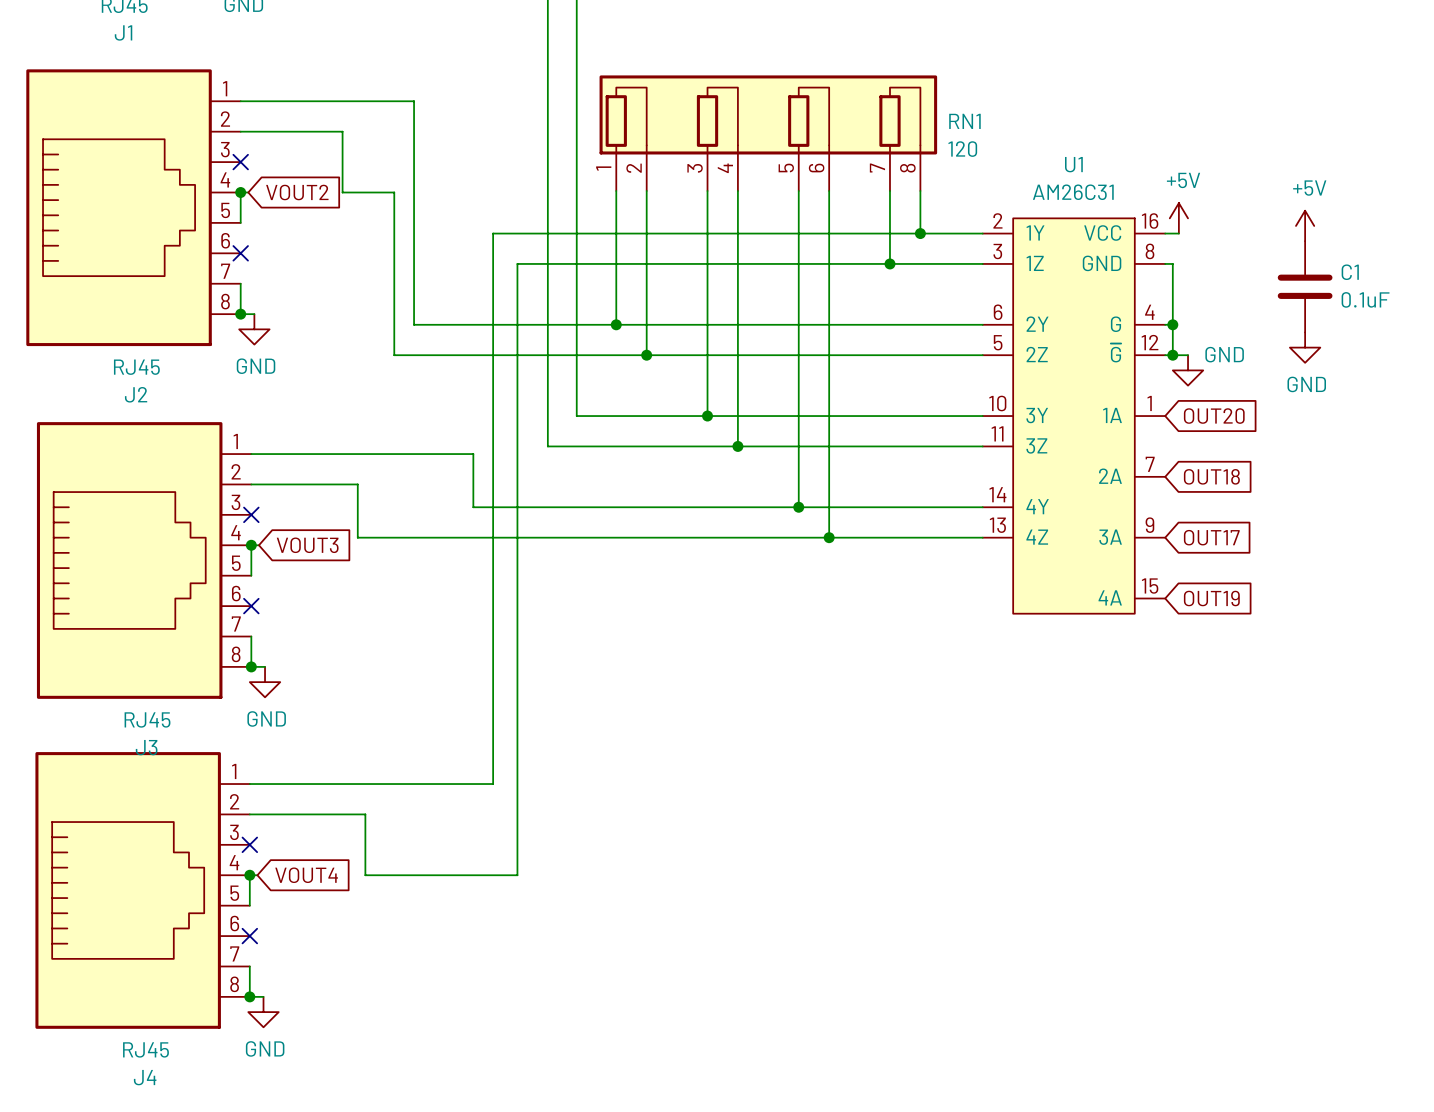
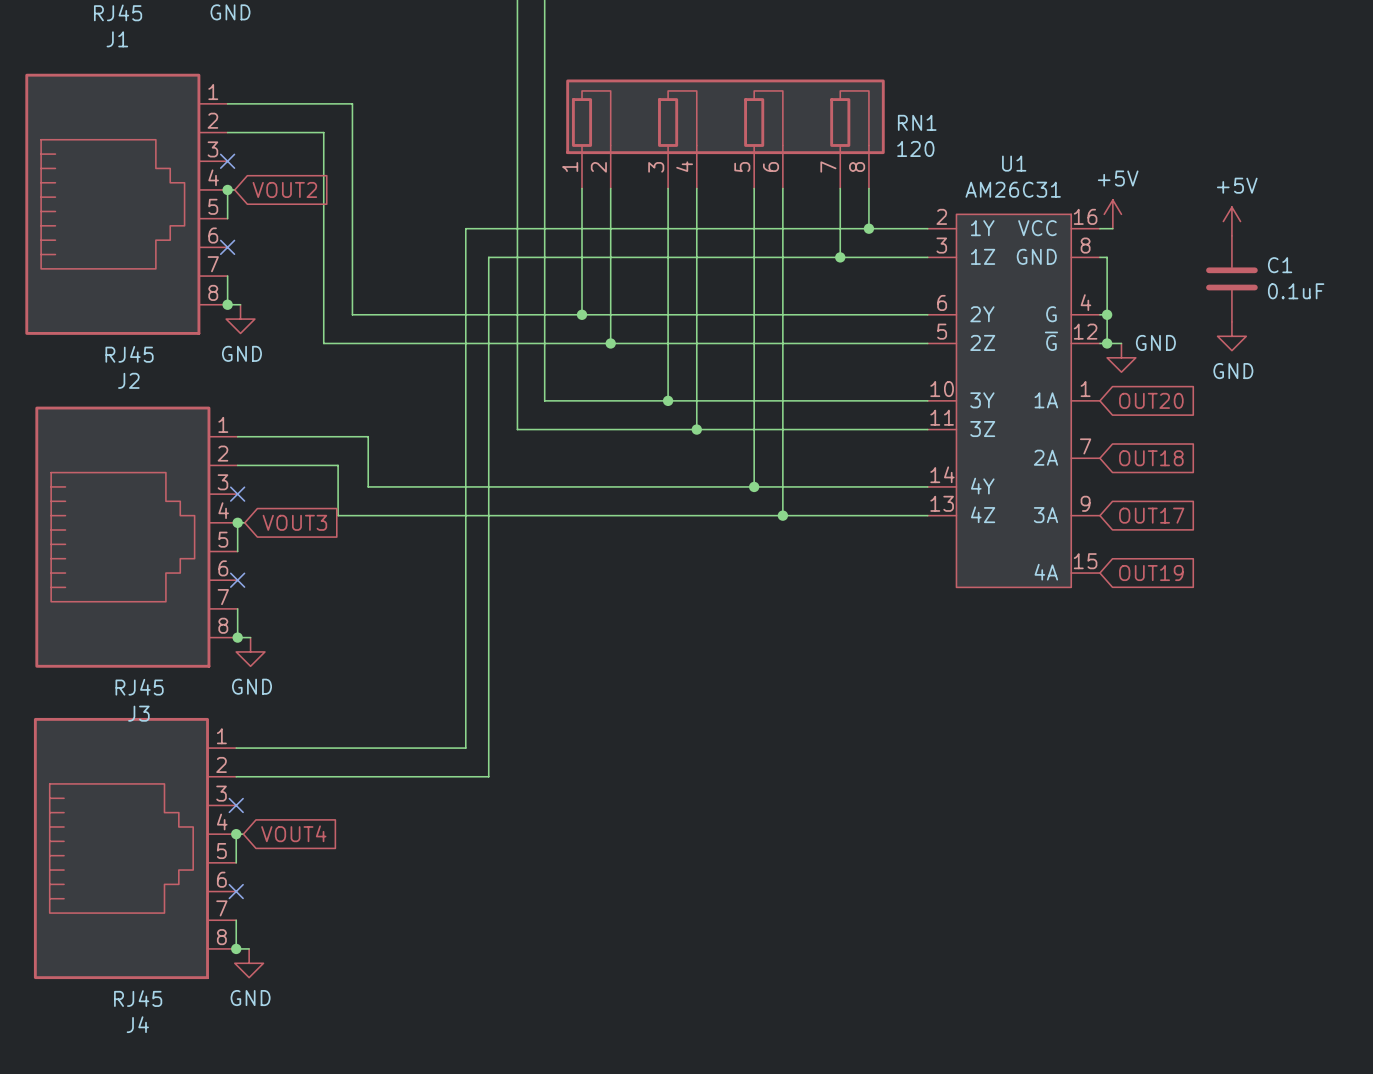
wire: (372, 101) (414, 101) (414, 324) -> (352, 103) (352, 314) (391, 314)
wire: (342, 192) (394, 192) (394, 355) -> (323, 189) (323, 343) (372, 343)
wire: (389, 454) (473, 454) (473, 507) -> (368, 436) (368, 486) (447, 486)
wire: (365, 814) (365, 875) (517, 875) (517, 814) -> (345, 776) (488, 776)

